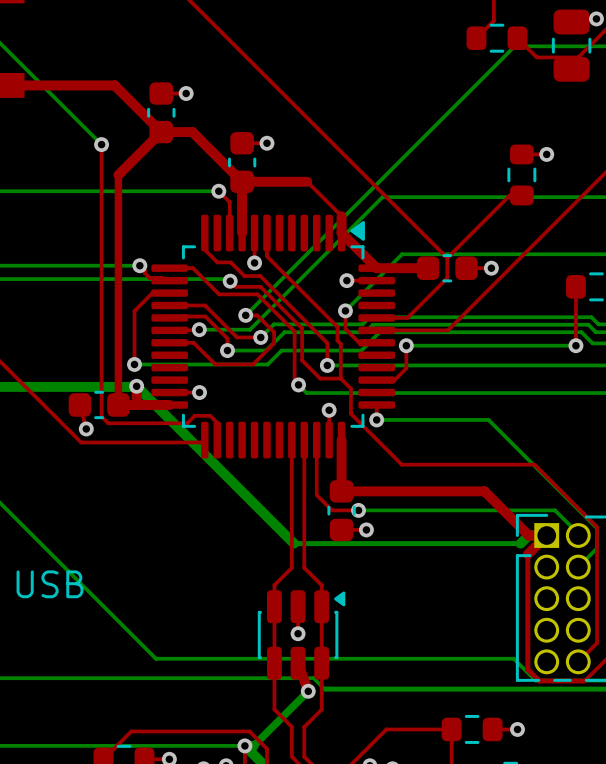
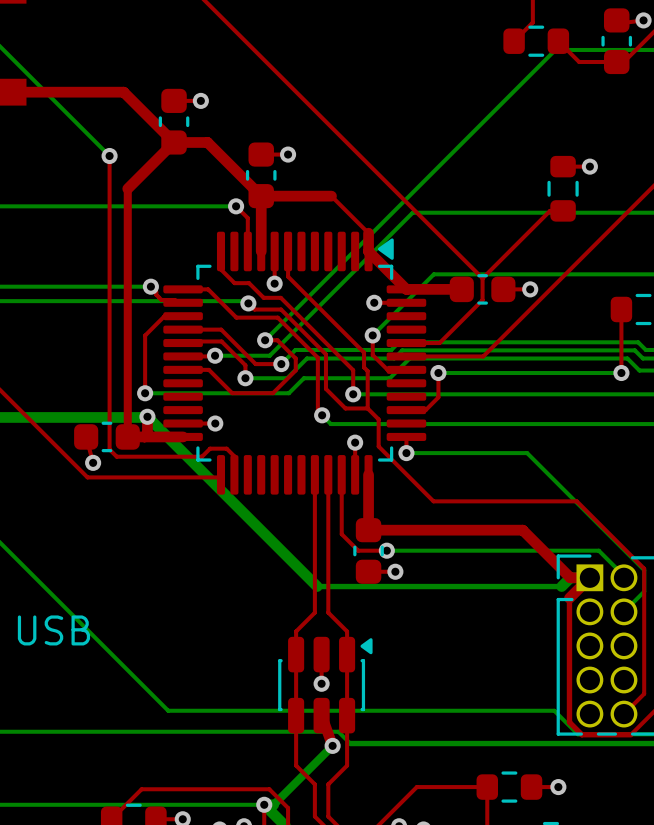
part footprint: [551, 9, 592, 82] -> [601, 8, 633, 75]

